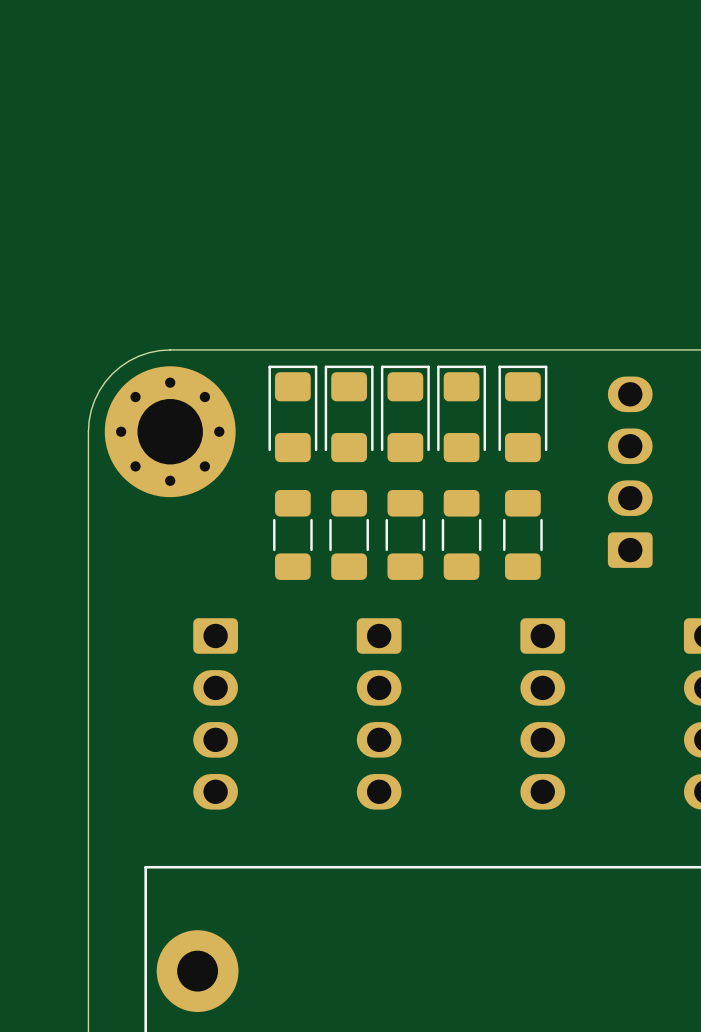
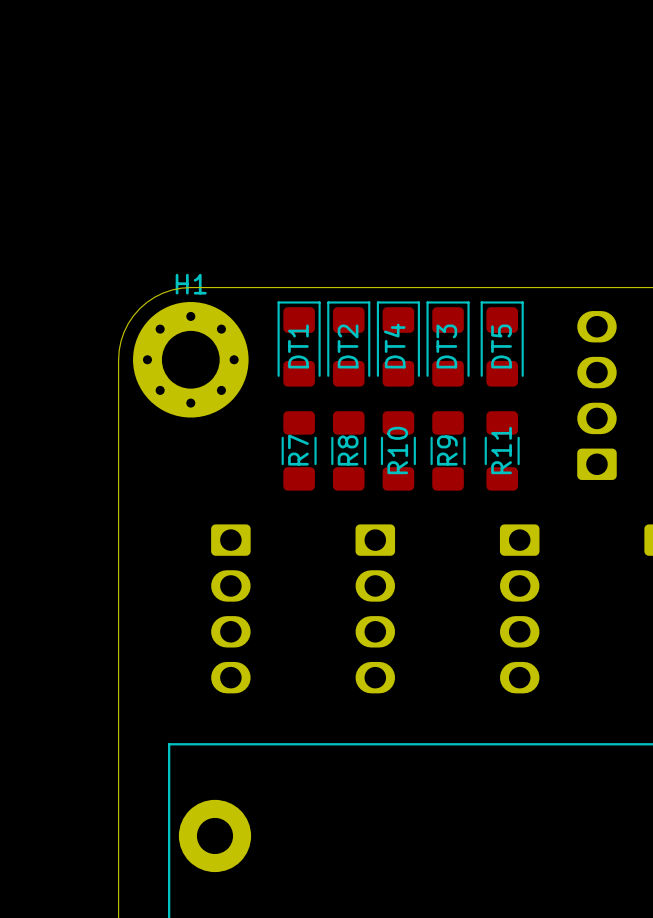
H1 name: none -> H1 (191, 284)
DT4 name: none -> DT4 (394, 346)
DT3 name: none -> DT3 (446, 346)
DT1 name: none -> DT1 (298, 346)
DT2 name: none -> DT2 (348, 346)
DT5 name: none -> DT5 (501, 346)
R7 name: none -> R7 (298, 450)
R8 name: none -> R8 (348, 450)
R10 name: none -> R10 (397, 450)
R9 name: none -> R9 (447, 450)
R11 name: none -> R11 (501, 450)

